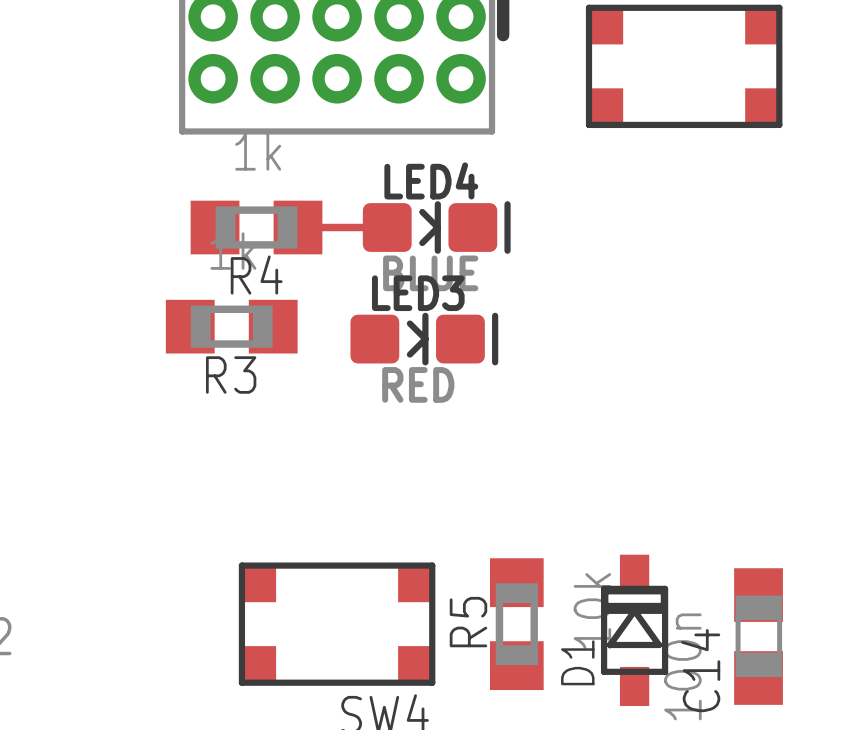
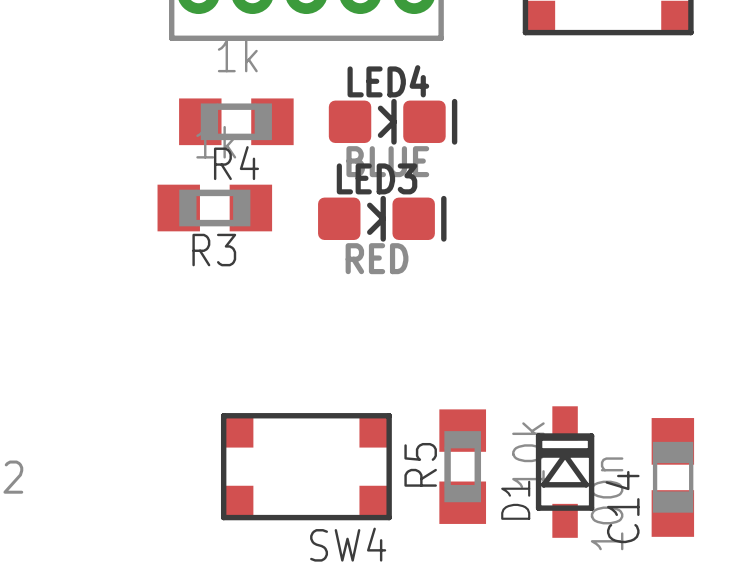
track: (298, 227) (387, 227) -> none

